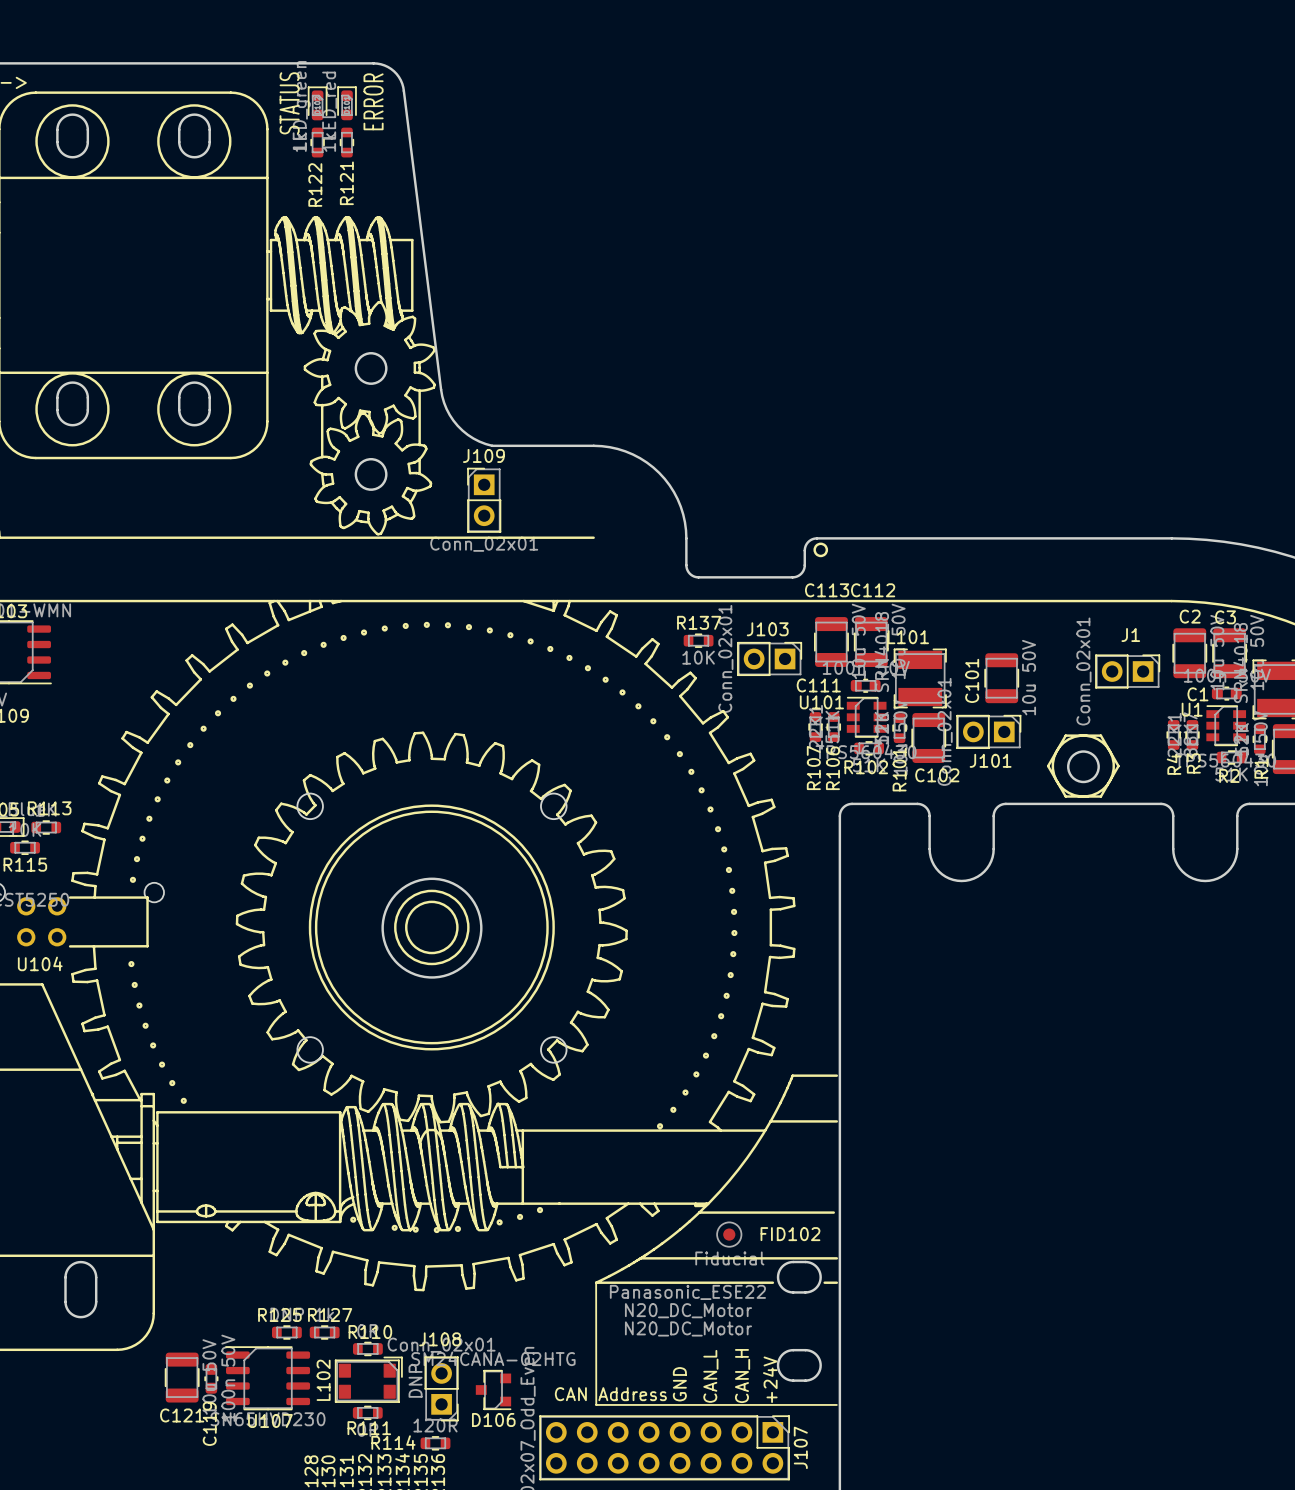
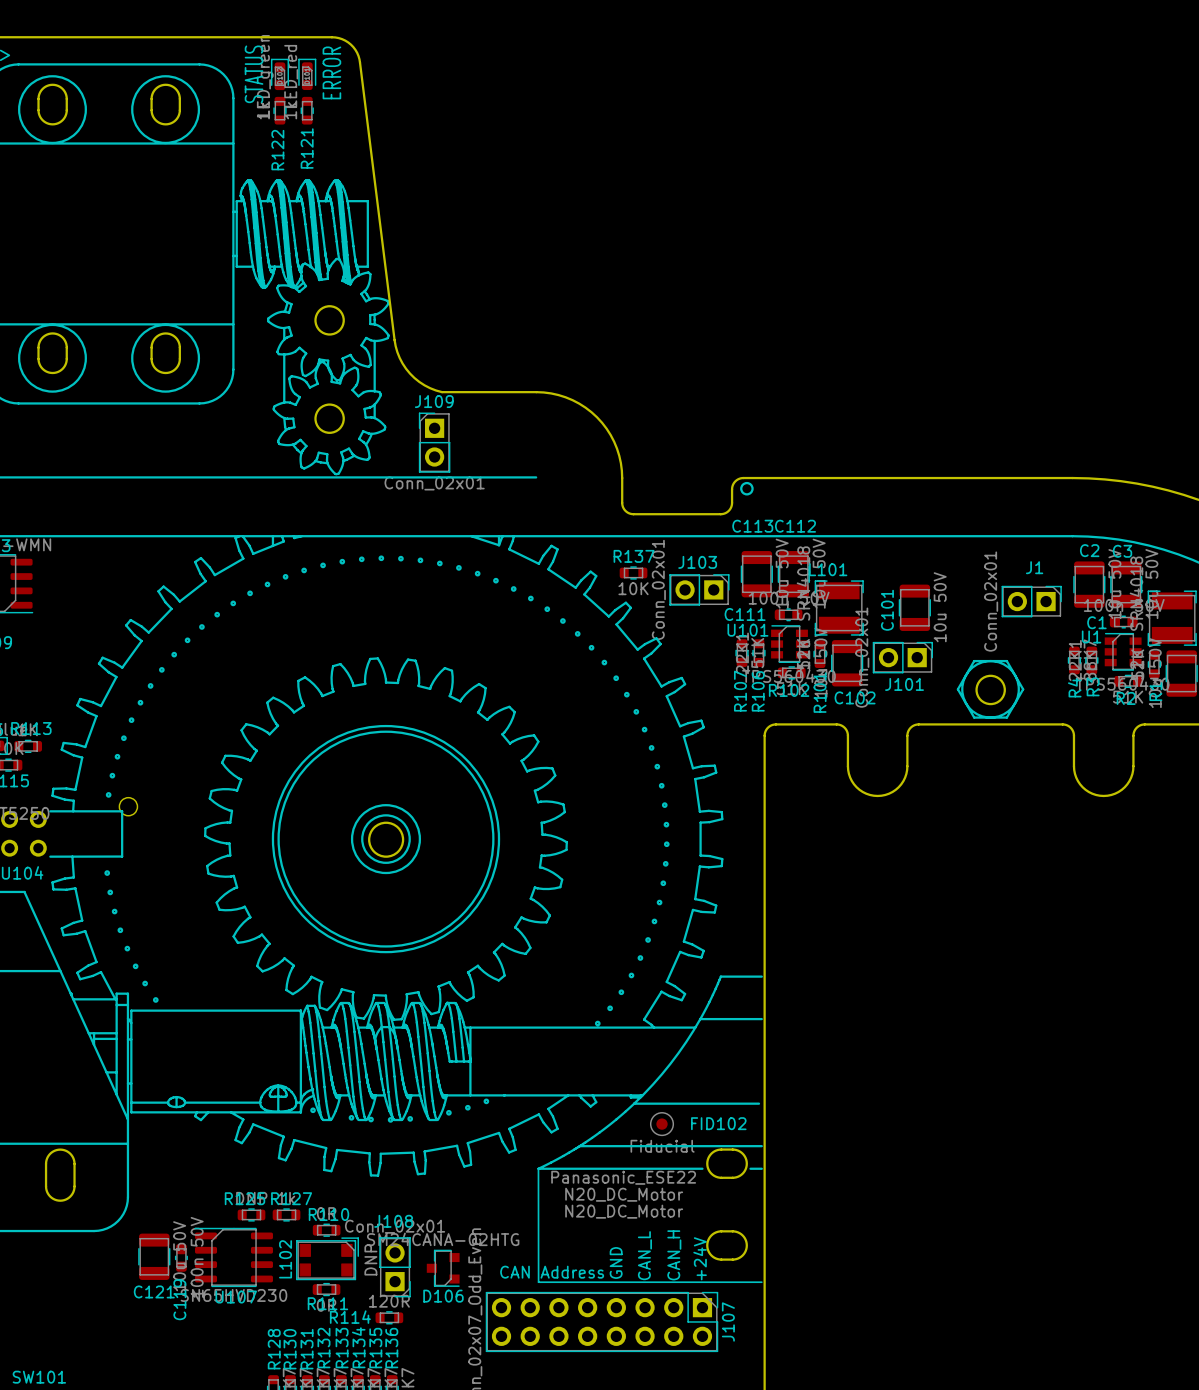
round board edge: [296, 792, 324, 821] -> none
round board edge: [540, 792, 568, 821] -> none
round board edge size: [381, 877, 483, 979] -> [368, 821, 405, 858]
round board edge: [296, 1036, 324, 1064] -> none
round board edge: [540, 1036, 568, 1064] -> none

